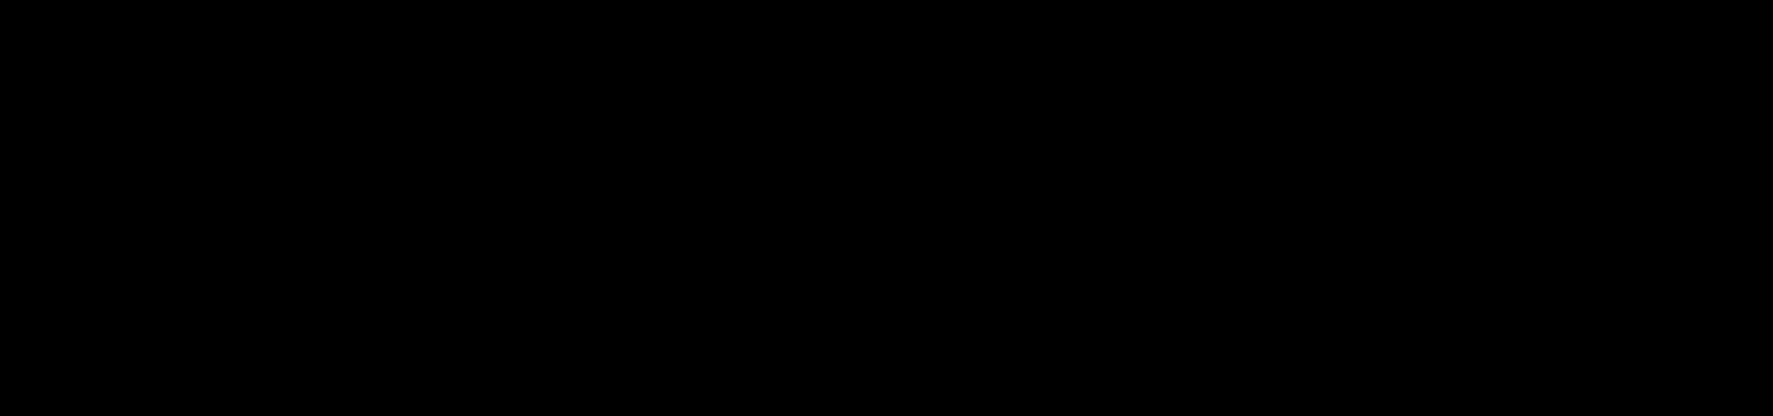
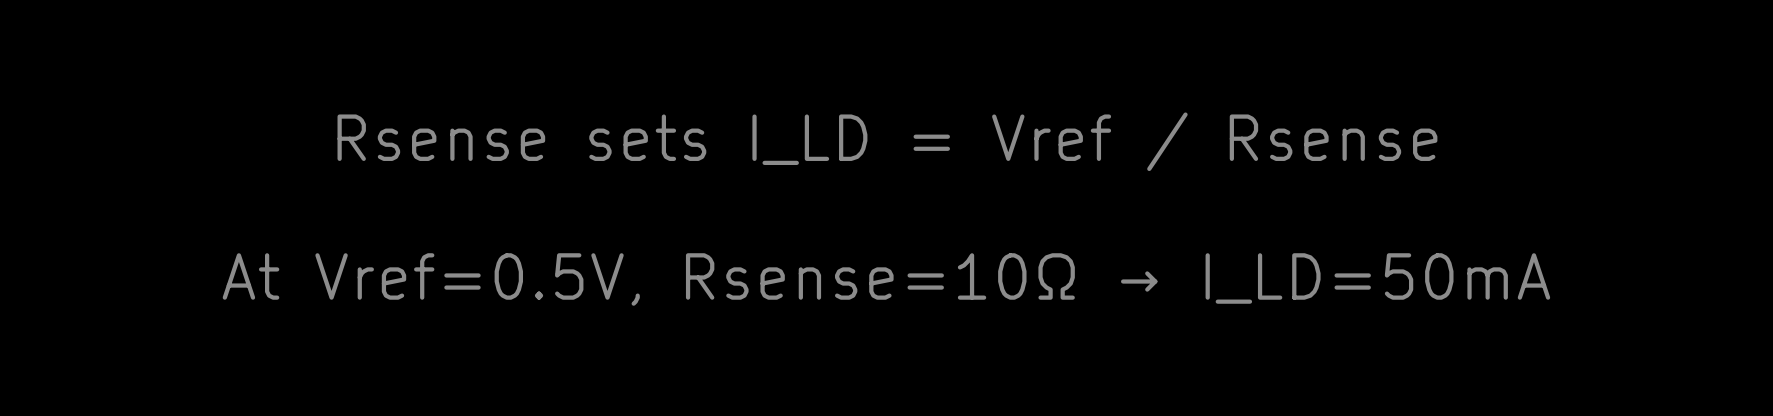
text: none -> Rsense sets I_LD = Vref / Rsense (887, 141)
text: none -> At Vref=0.5V, Rsense=10Ω → I_LD=50mA (886, 279)

